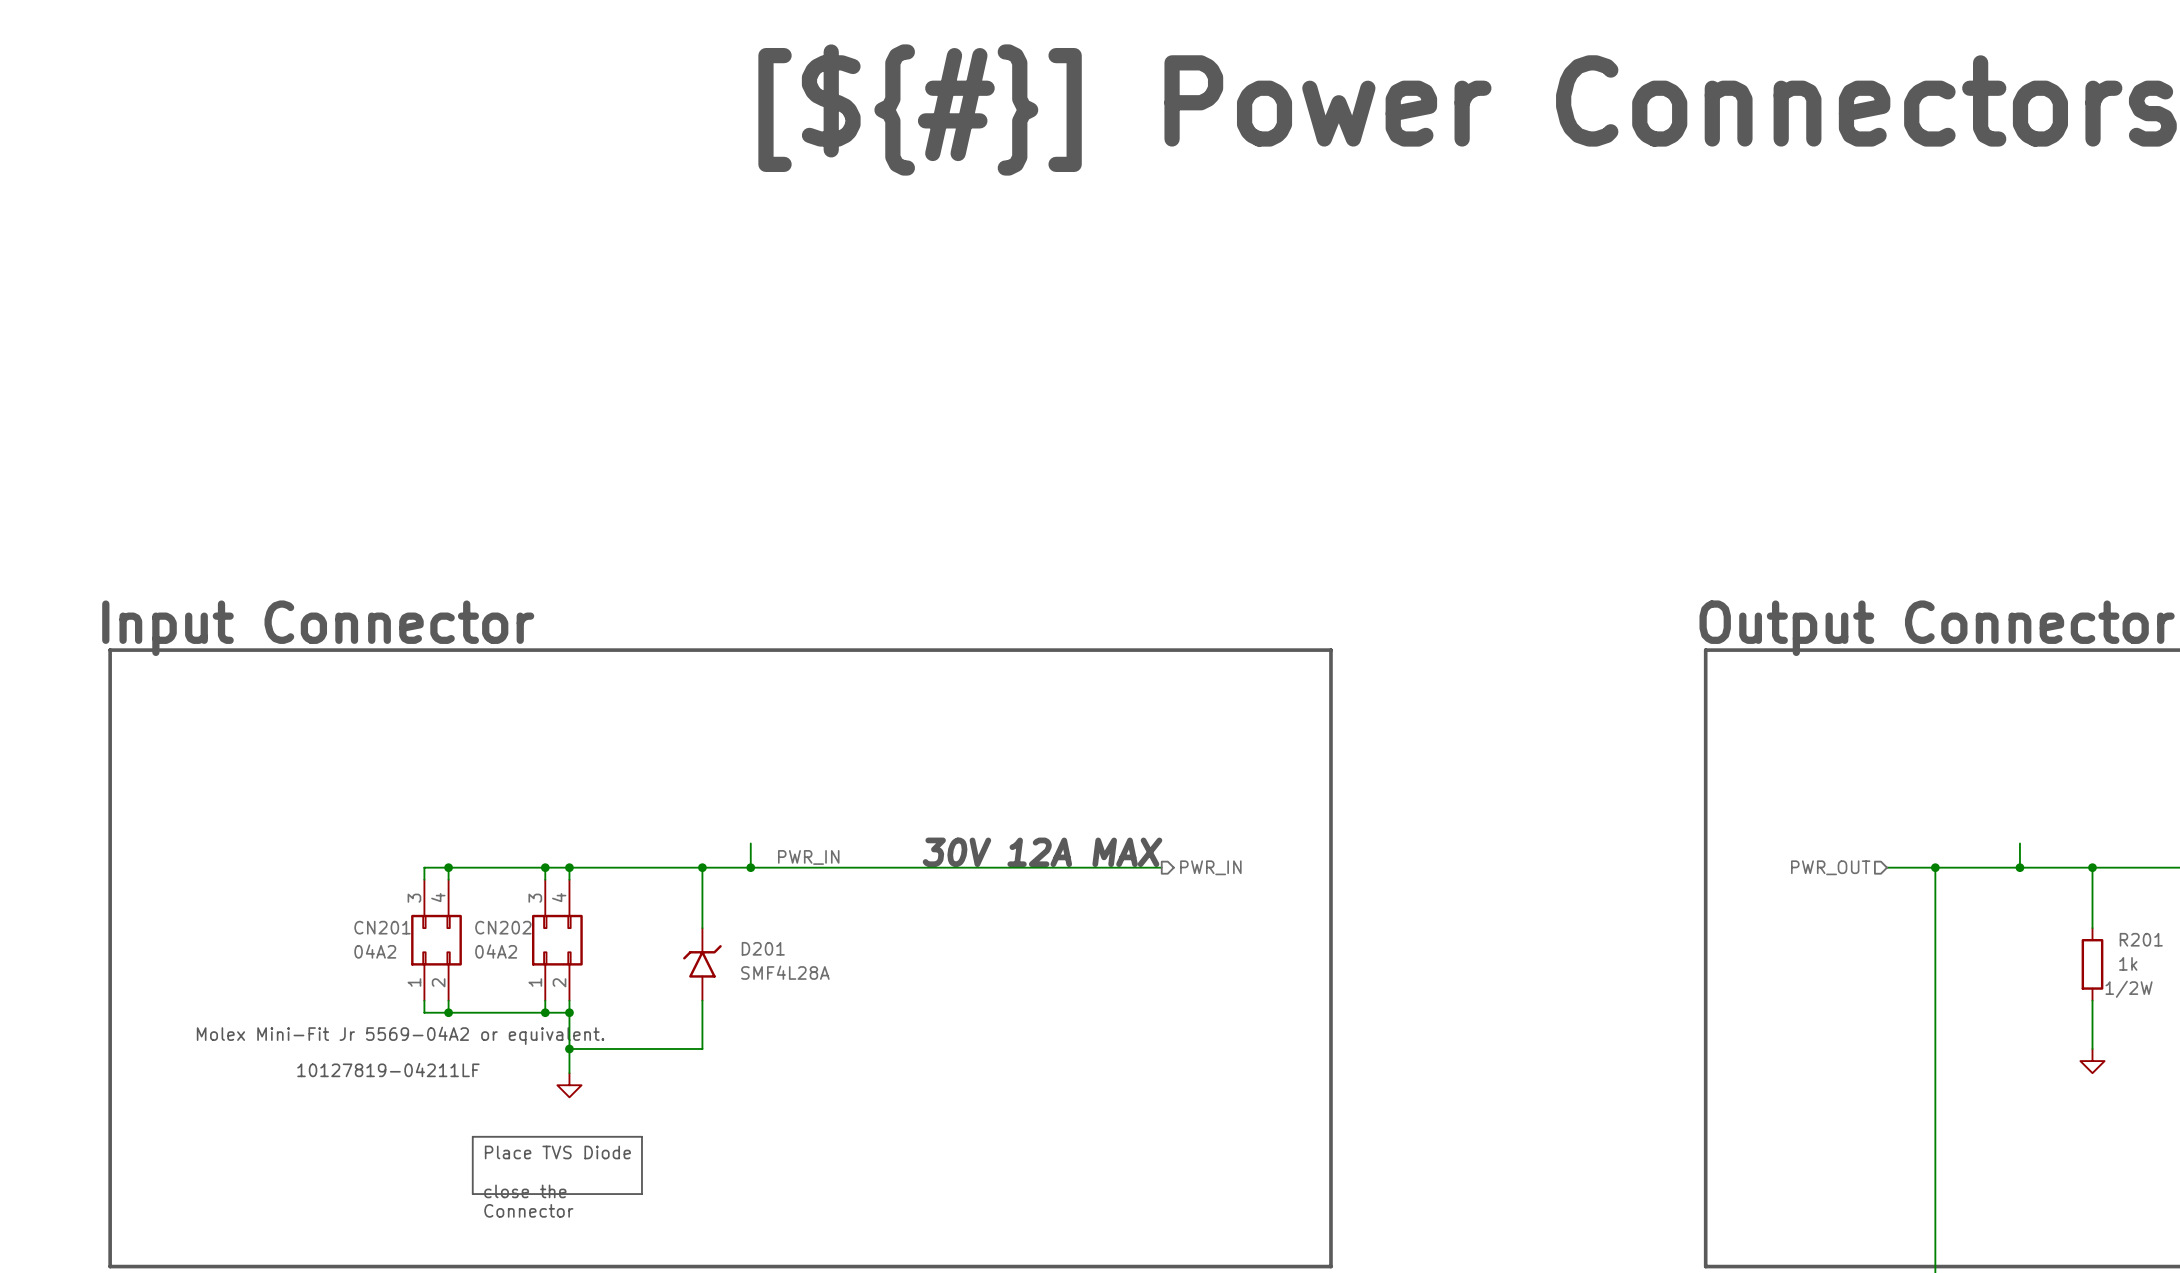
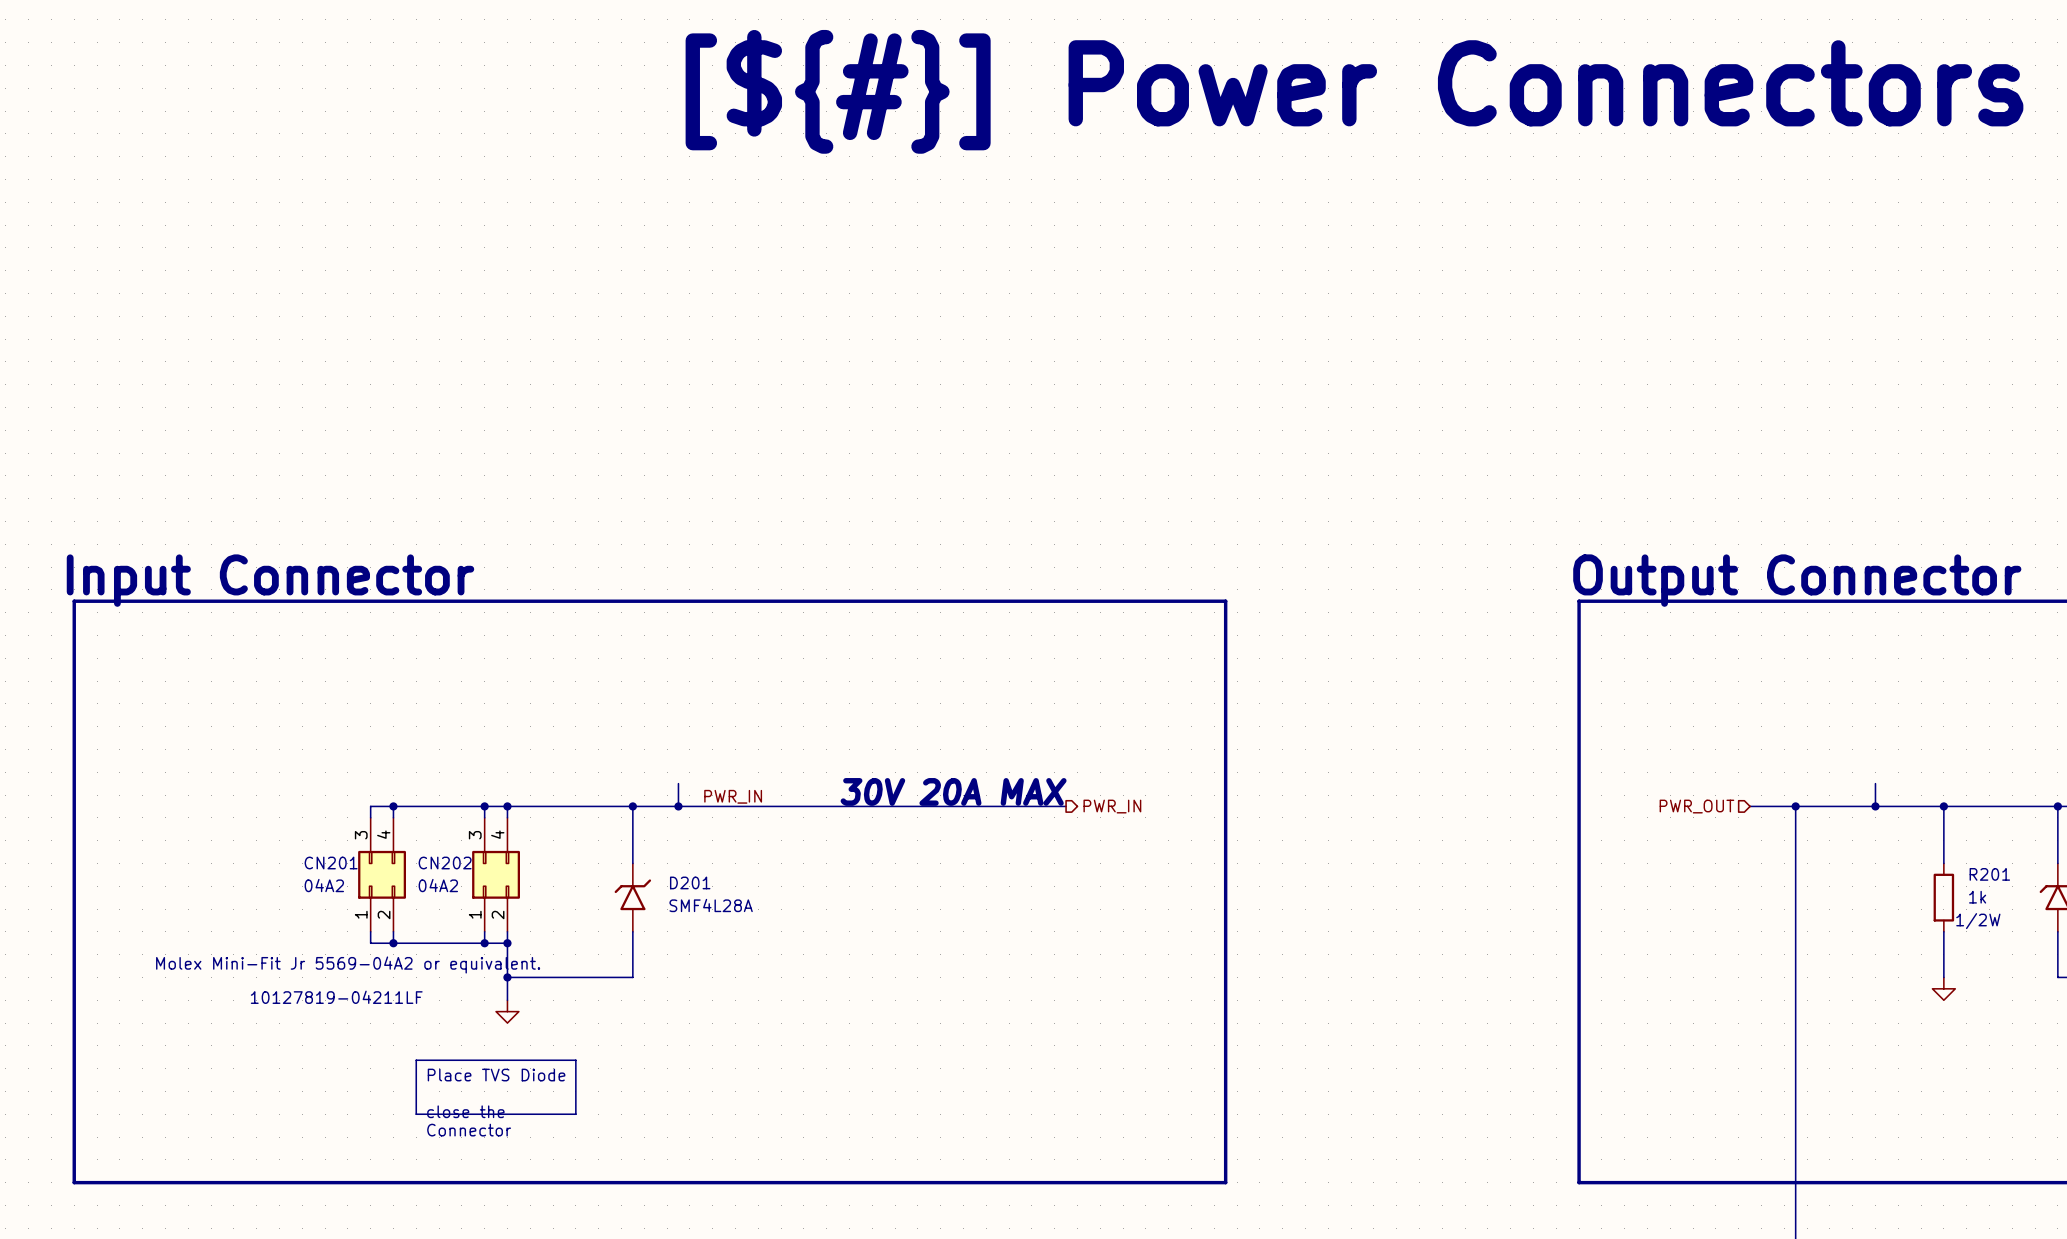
text: 30V 12A MAX (1042, 852) -> 30V 20A MAX (953, 791)

